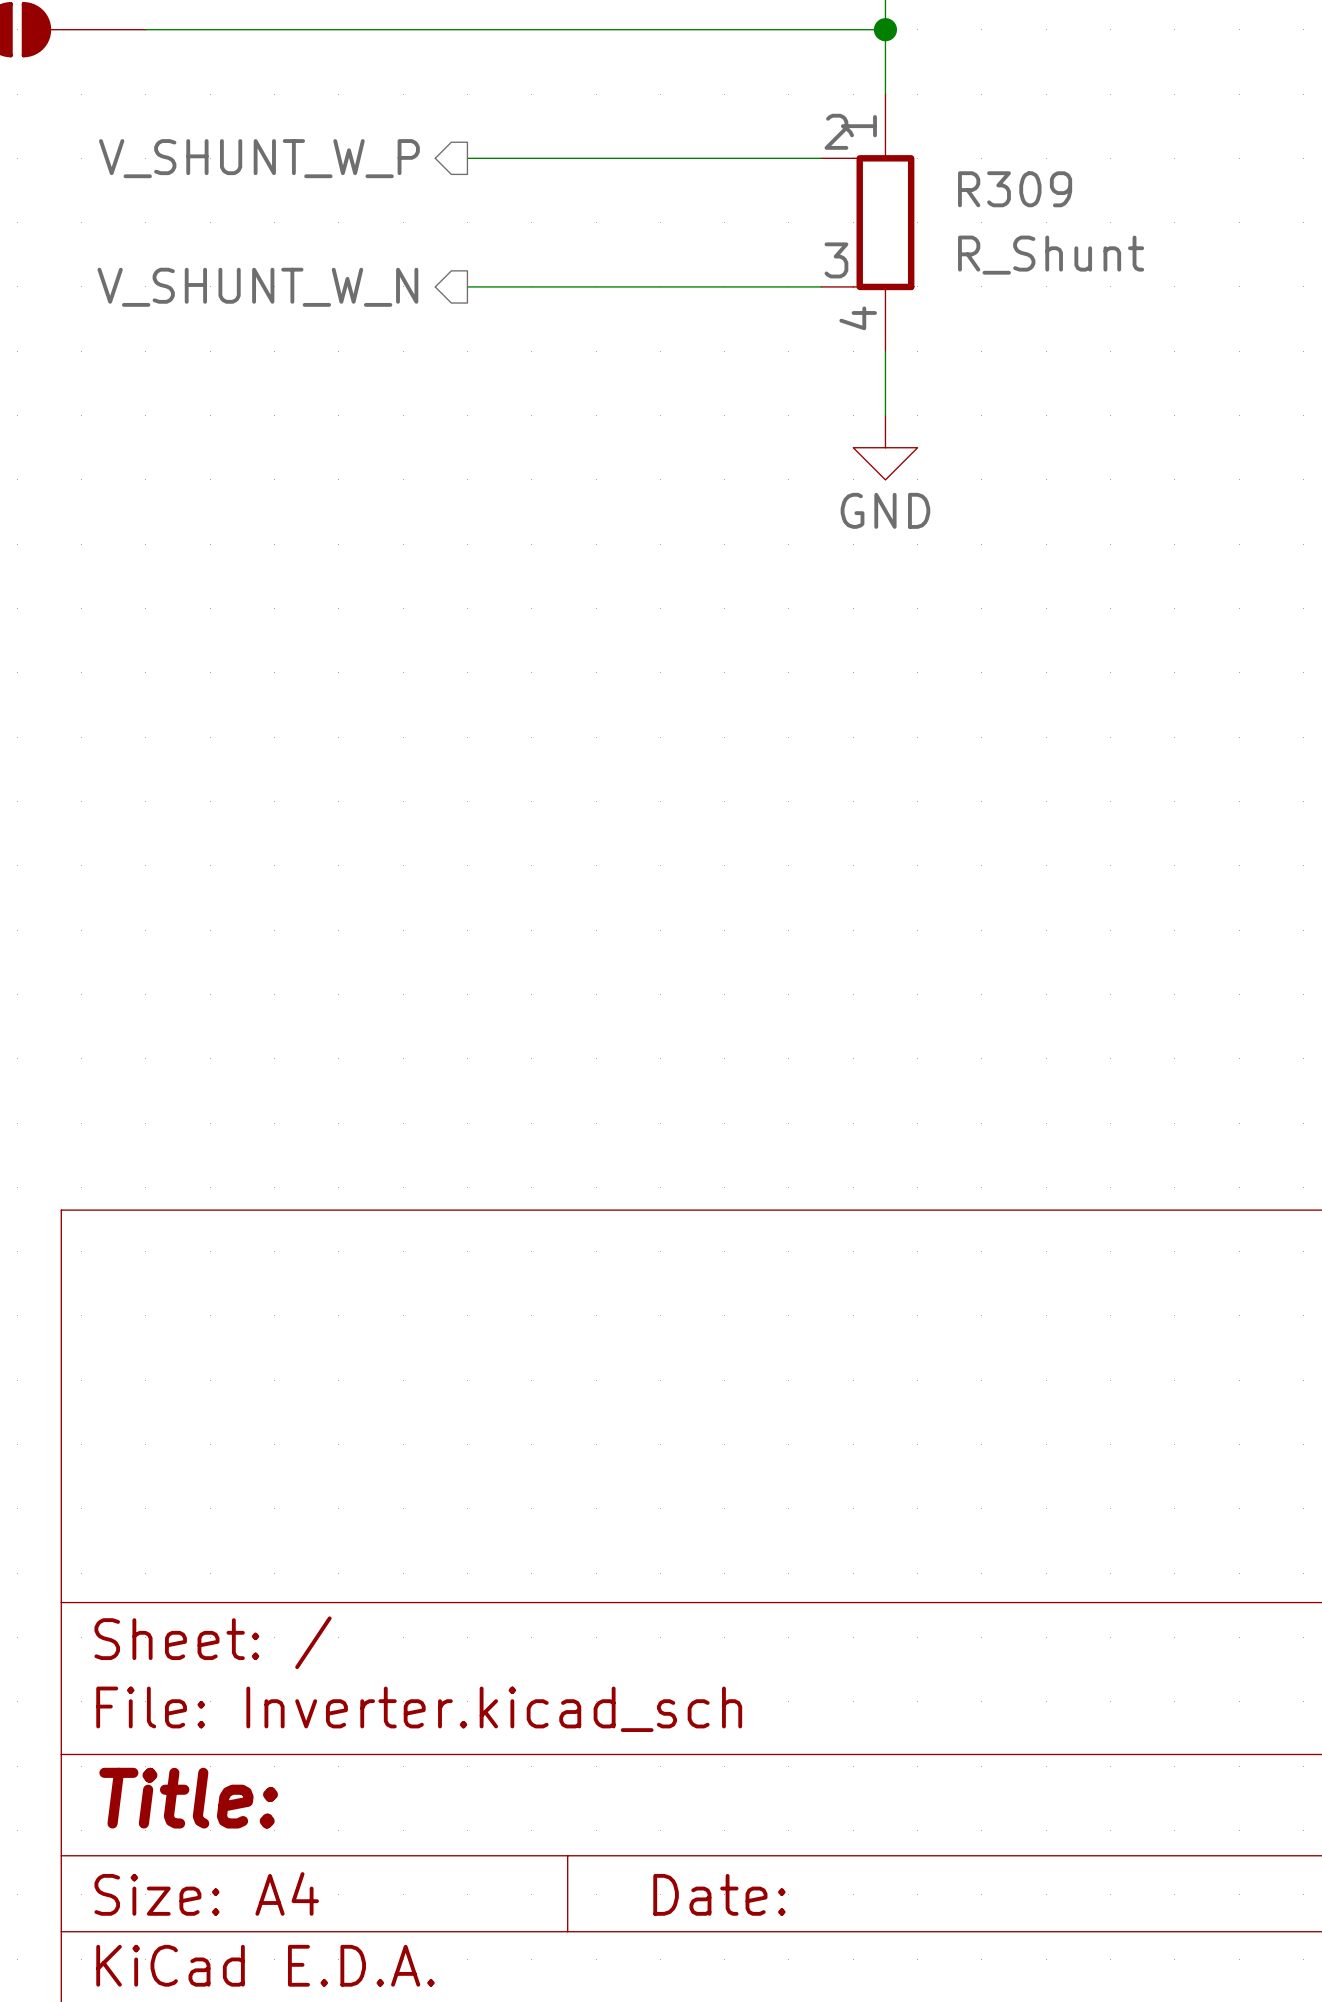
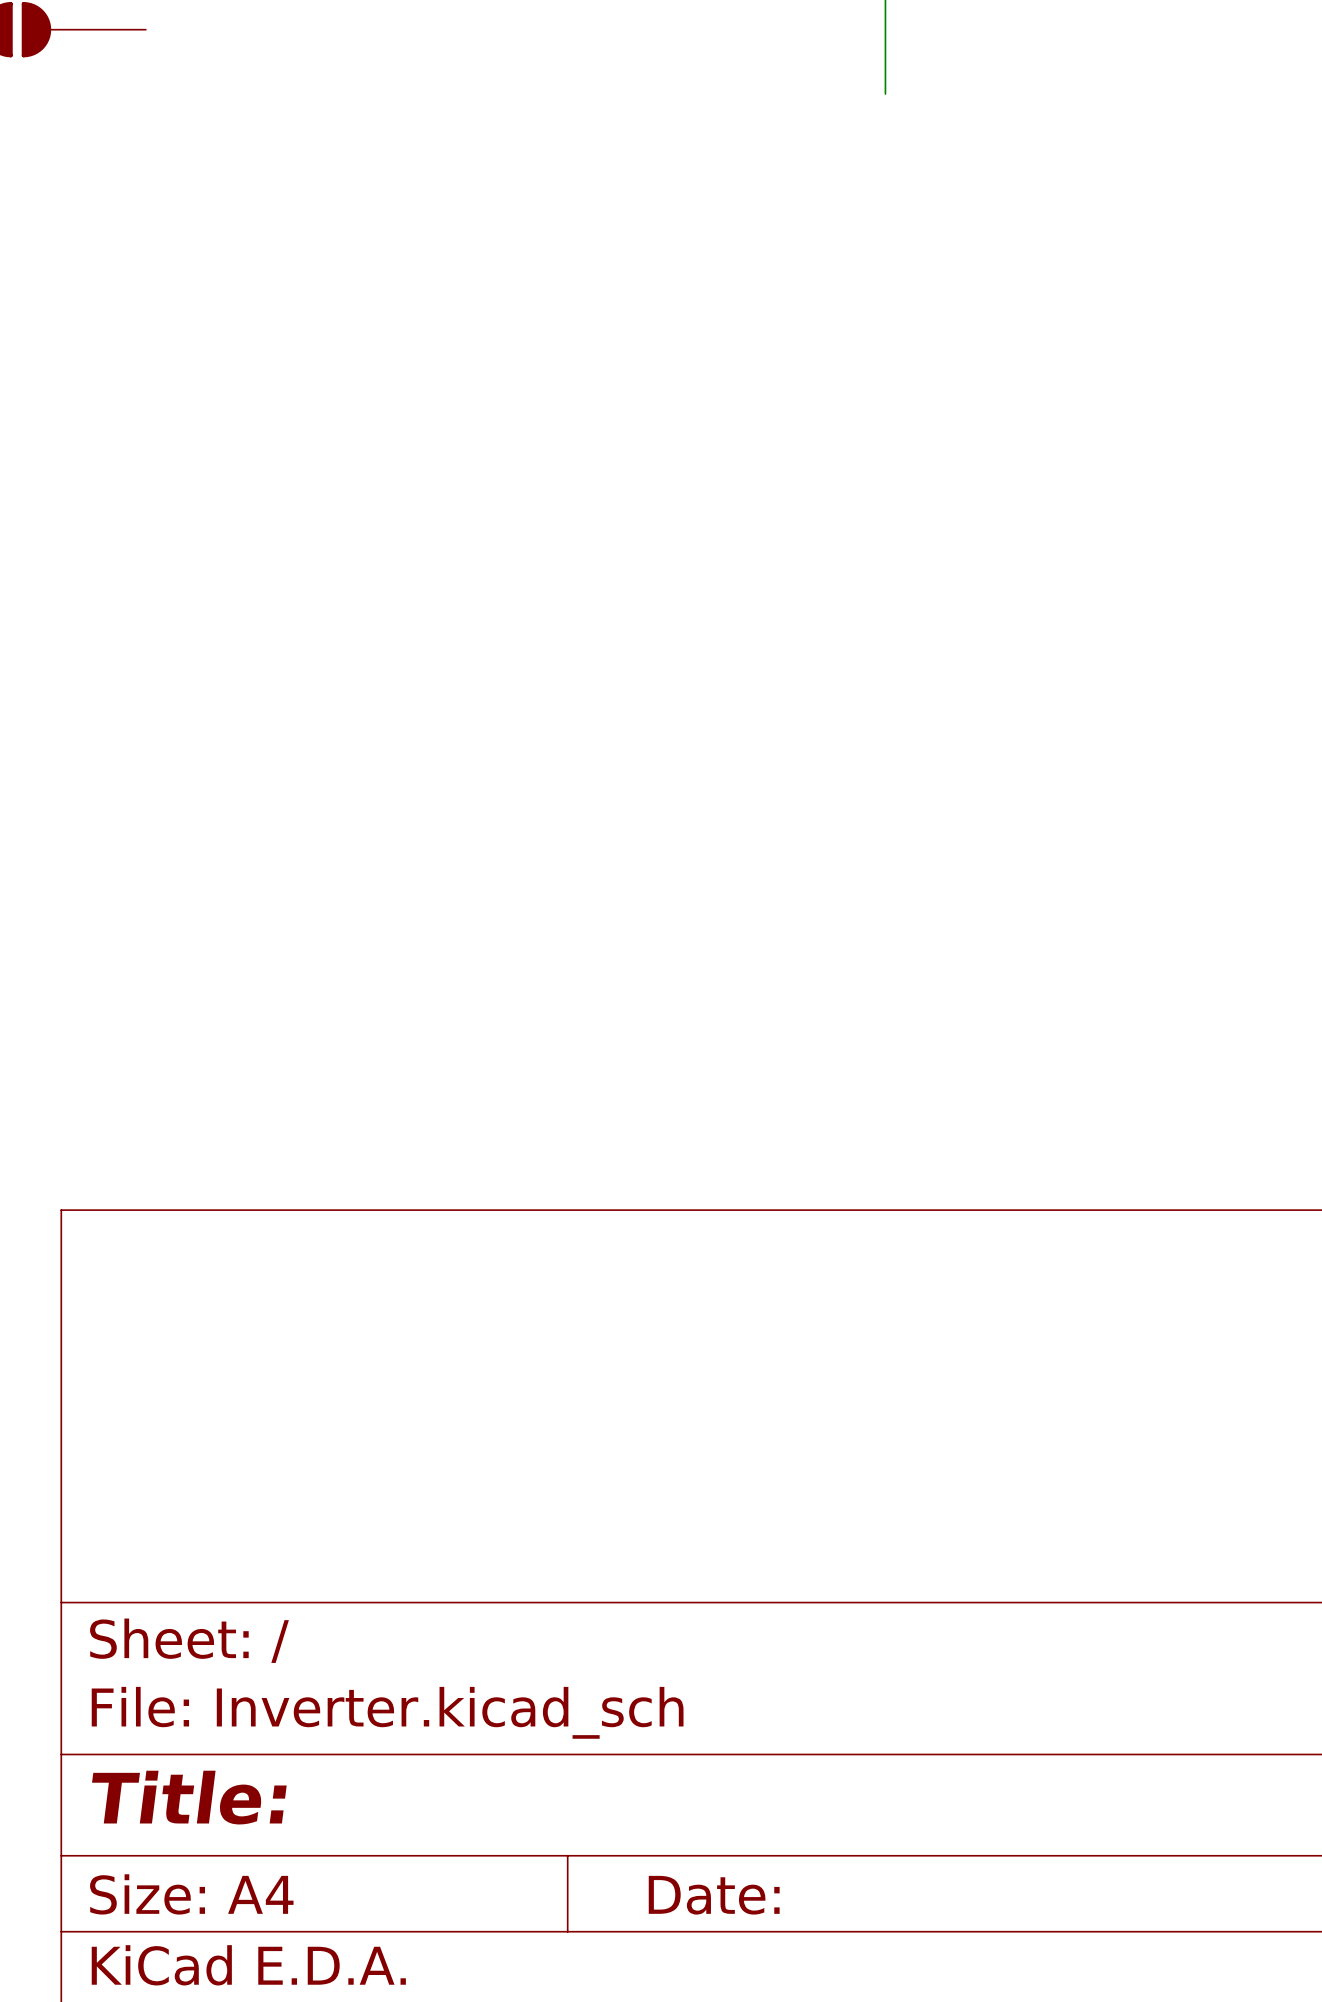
wire: (145, 29) (885, 29) -> none
junction: (885, 29) -> none
hierarchical label: V_SHUNT_W_P (259, 158) -> none
wire: (467, 158) (821, 158) -> none
R309: R_Shunt (867, 222) -> none
wire: (467, 286) (821, 286) -> none
hierarchical label: V_SHUNT_W_N (257, 287) -> none
wire: (885, 351) (885, 415) -> none
power symbol: GND (885, 447) -> none

